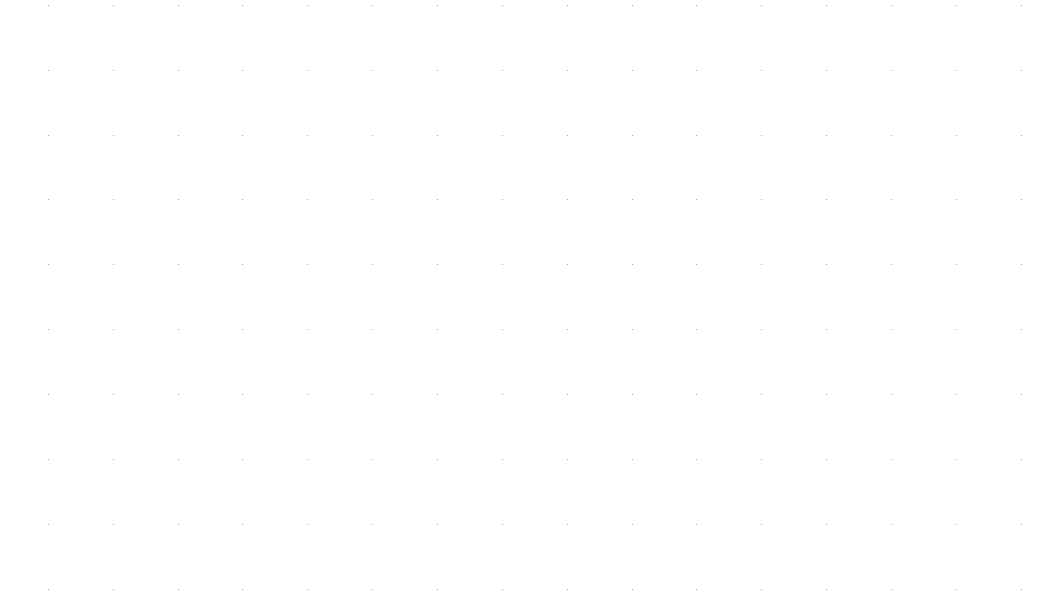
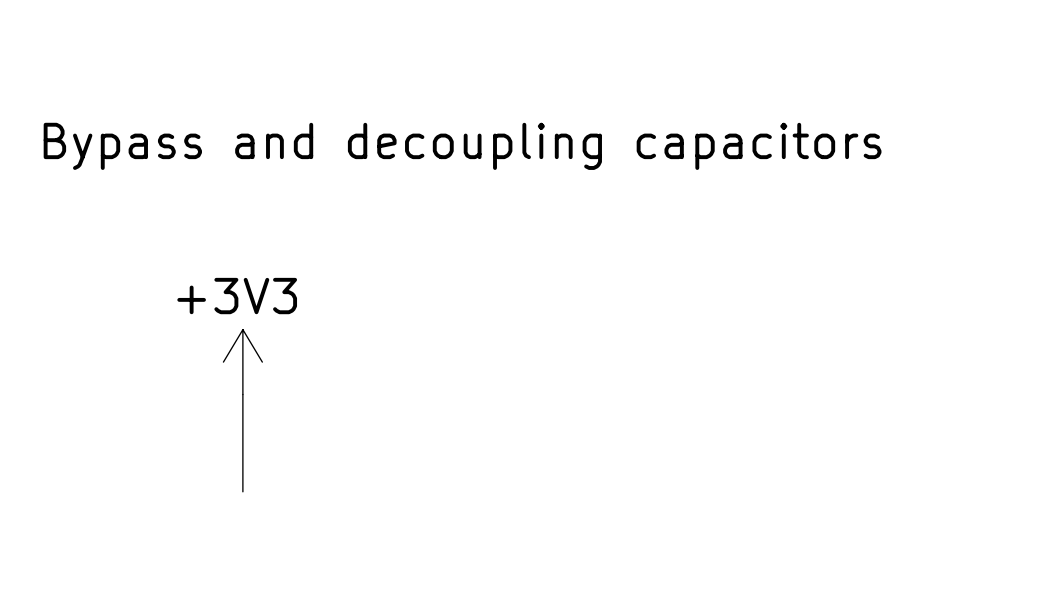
text: none -> Bypass and decoupling capacitors (462, 146)
power symbol: none -> +3V3 (242, 362)
wire: none -> (242, 394) (242, 491)

